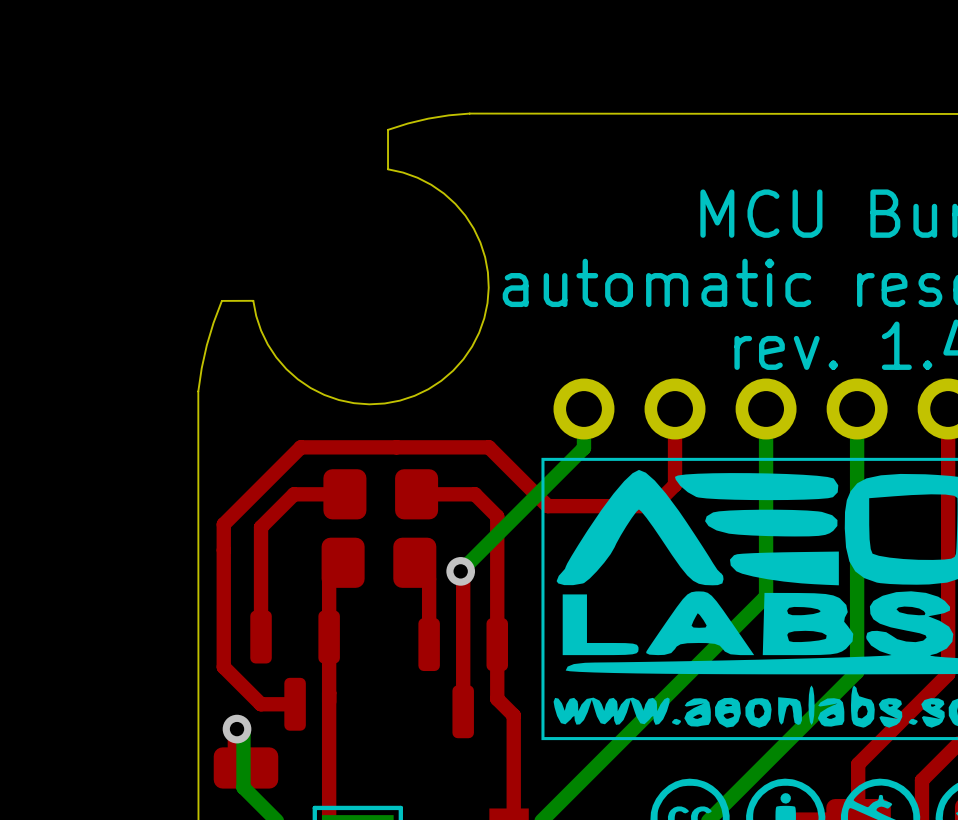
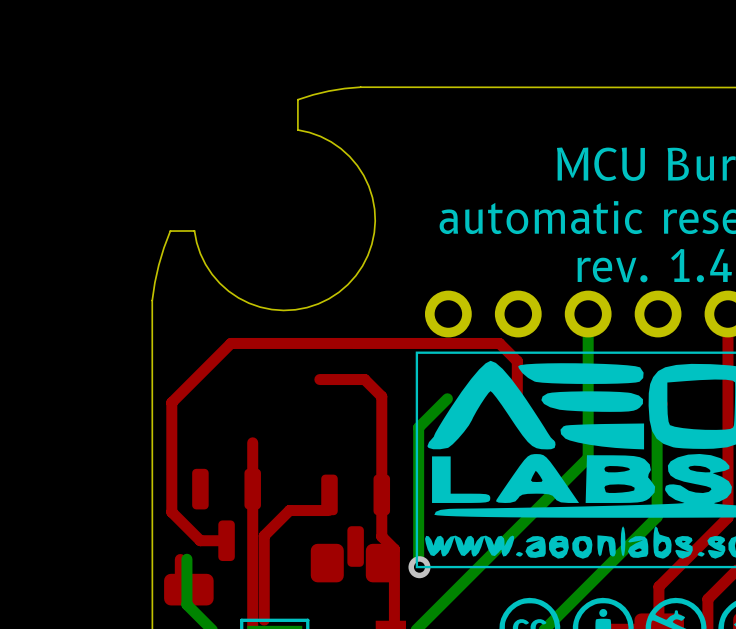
bottom track: (583, 409) (583, 448) (460, 571) -> none
top track: (675, 409) (675, 484) (653, 506) (547, 506) (489, 447) -> (517, 398) (517, 361) (499, 343) (375, 343)
bottom track: (857, 409) (855, 673) -> (657, 398) (657, 516)
top track: (344, 494) (294, 494) (261, 527) (261, 637) -> (328, 510) (289, 510) (264, 535) (264, 620)
part: (380, 494) -> none
bottom track: none -> (447, 398) (418, 427) (418, 563)
part: (378, 562) -> none
top track: (463, 568) (463, 711) -> none
via: (460, 571) -> none
top track: (429, 579) (429, 644) -> none
via: (237, 729) -> none
part: none -> (354, 563)
via: none -> (419, 567)

